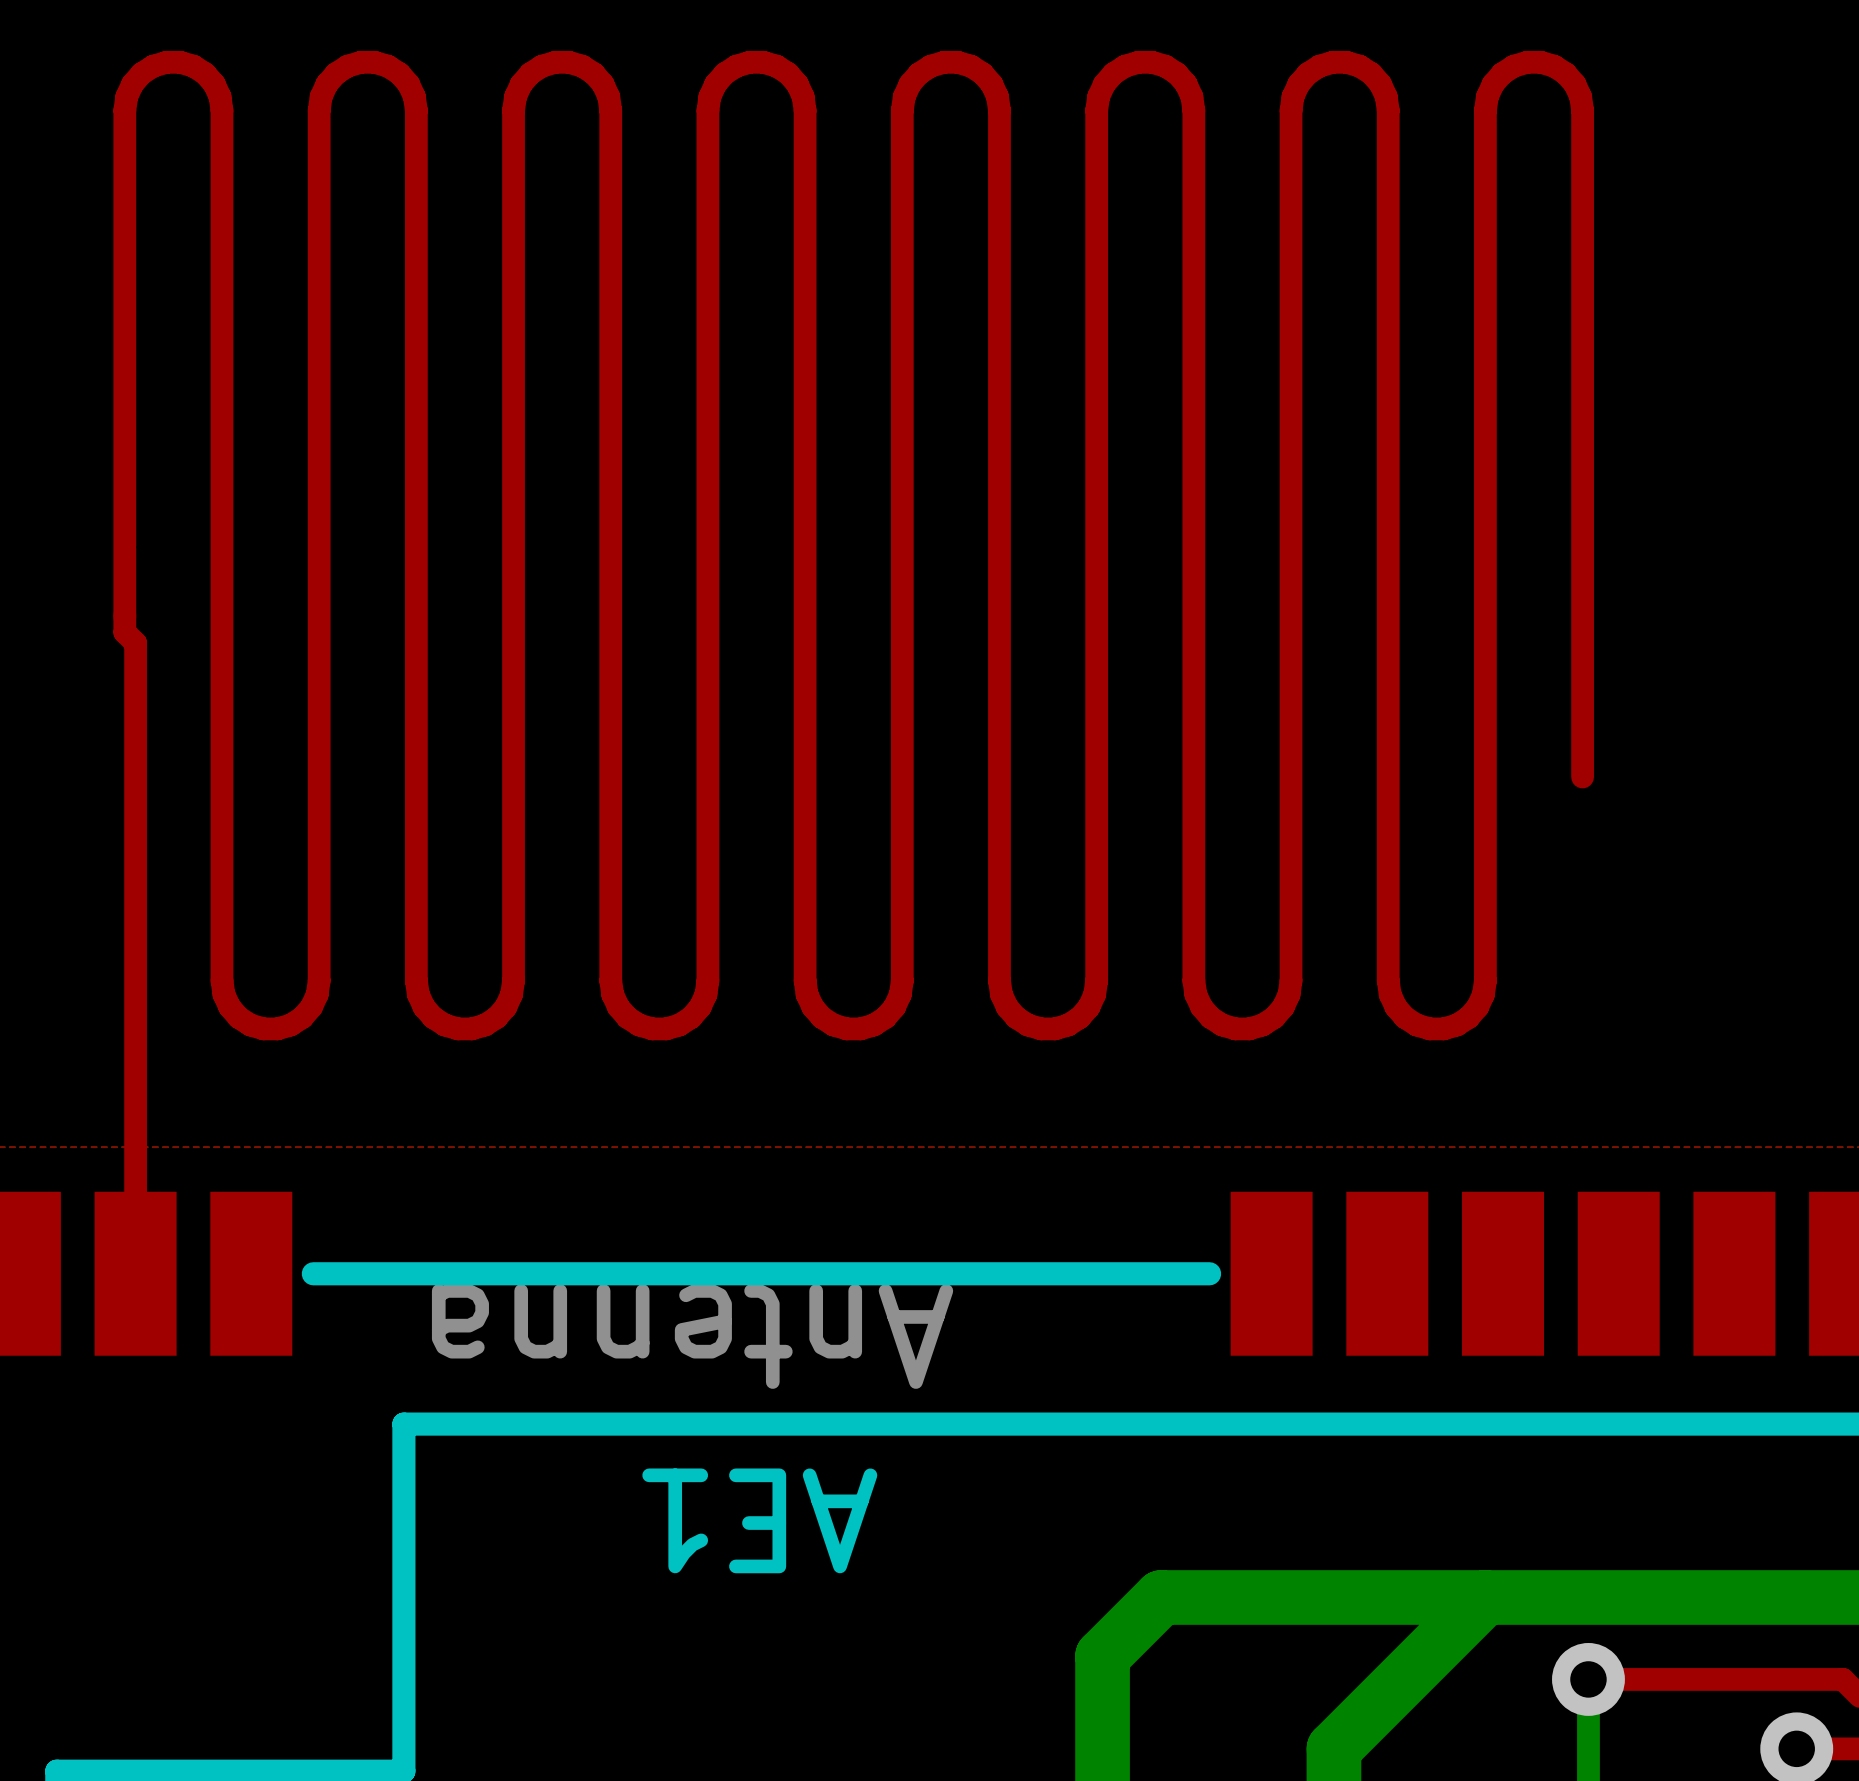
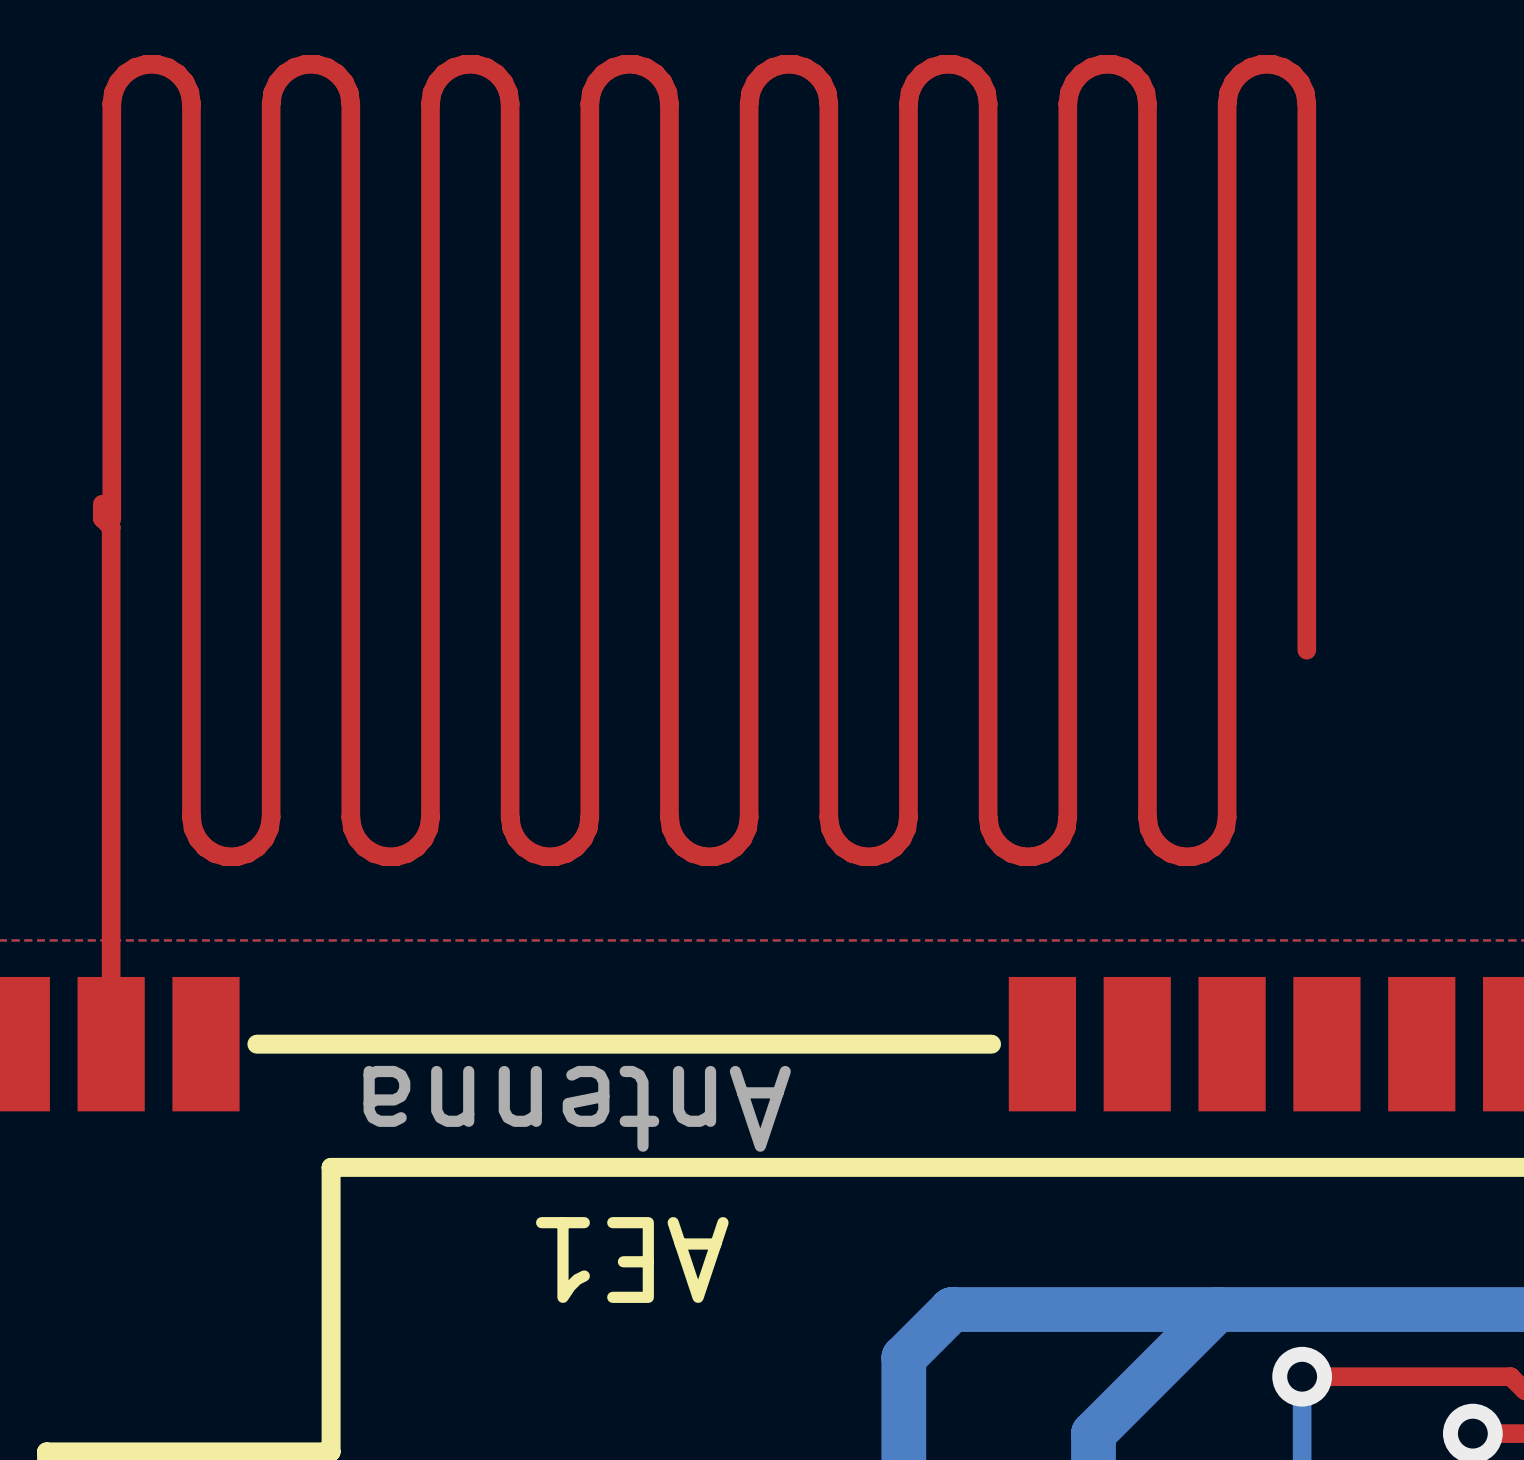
AE1 position: (853, 545) -> (709, 460)

